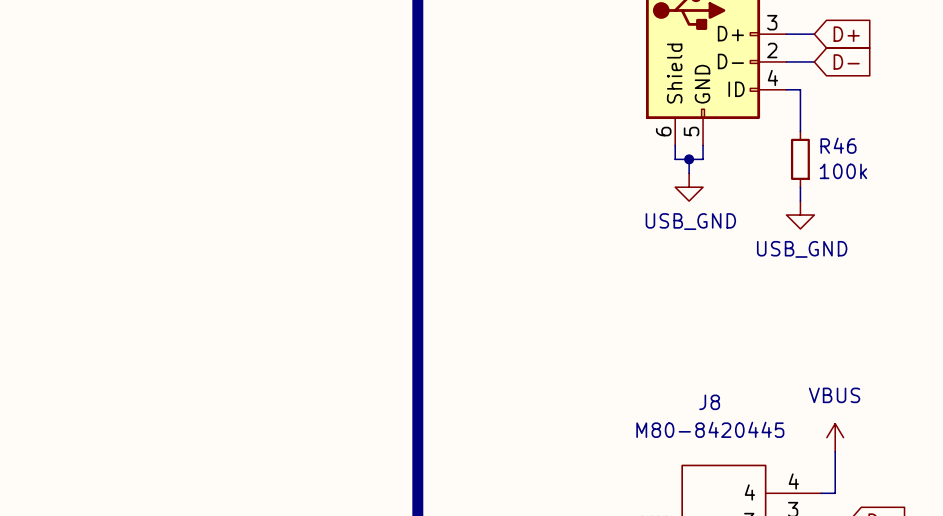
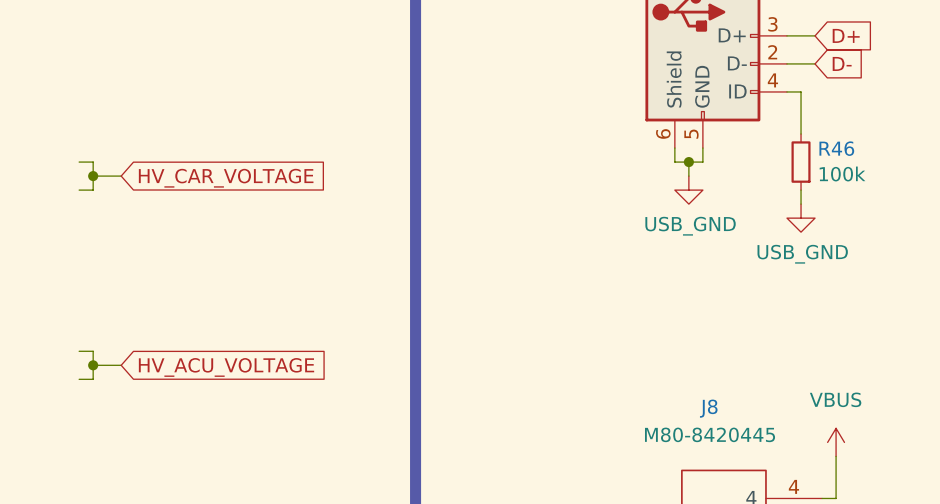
wire: none -> (79, 162) (93, 162) (93, 190) (79, 190)
wire: none -> (93, 176) (121, 176)
junction: none -> (93, 176)
global label: none -> HV_CAR_VOLTAGE (226, 178)
wire: none -> (79, 351) (93, 351) (93, 379) (79, 379)
wire: none -> (93, 365) (121, 365)
junction: none -> (93, 365)
global label: none -> HV_ACU_VOLTAGE (226, 367)

